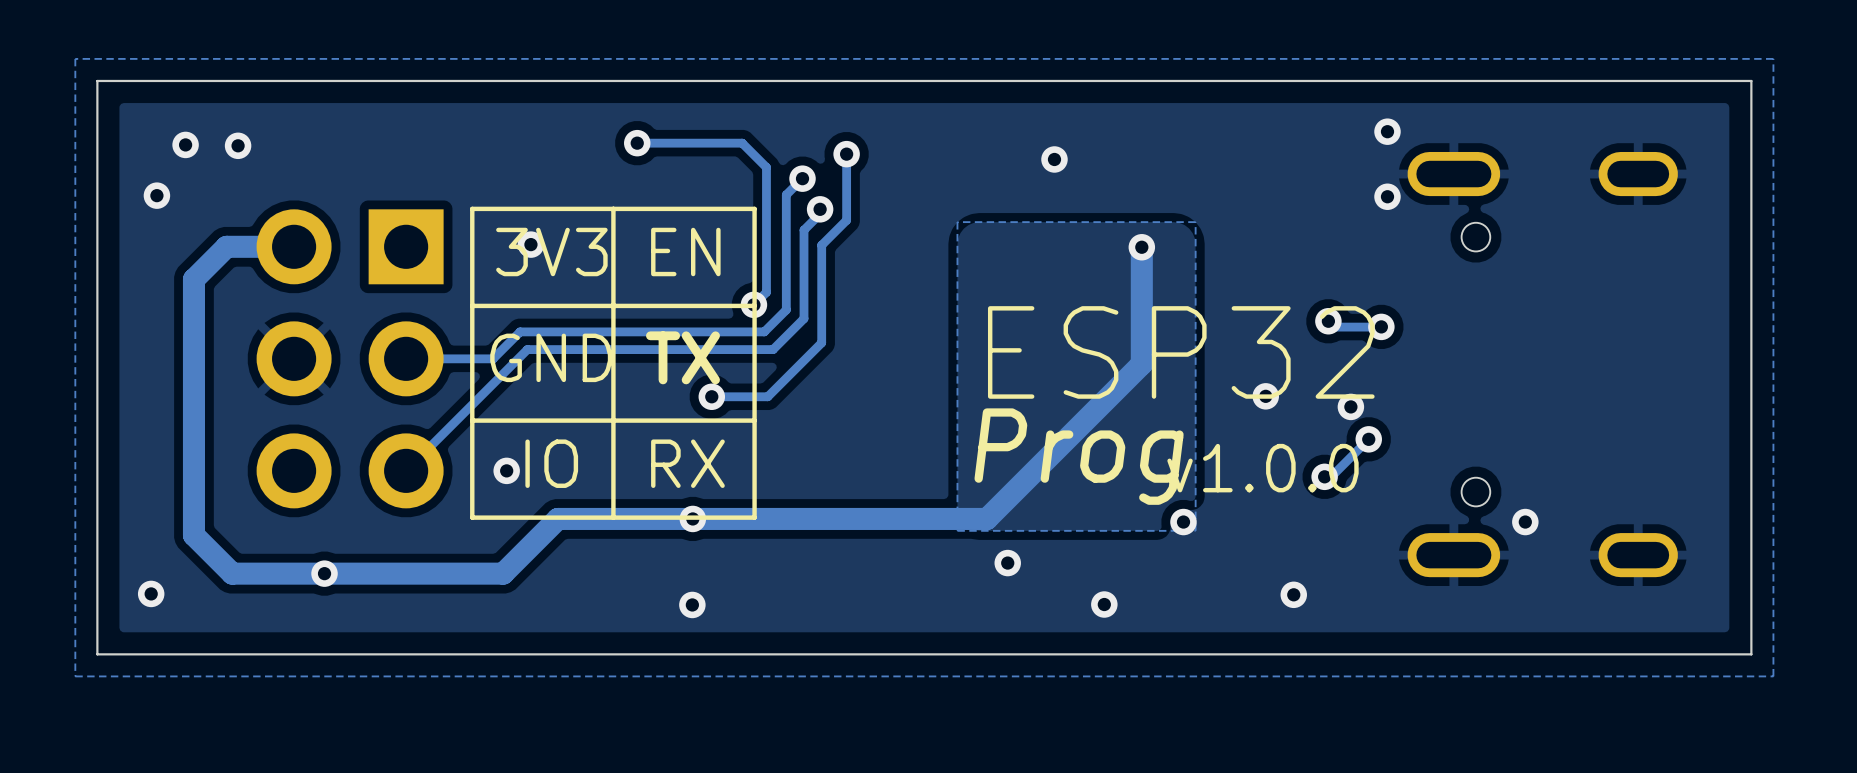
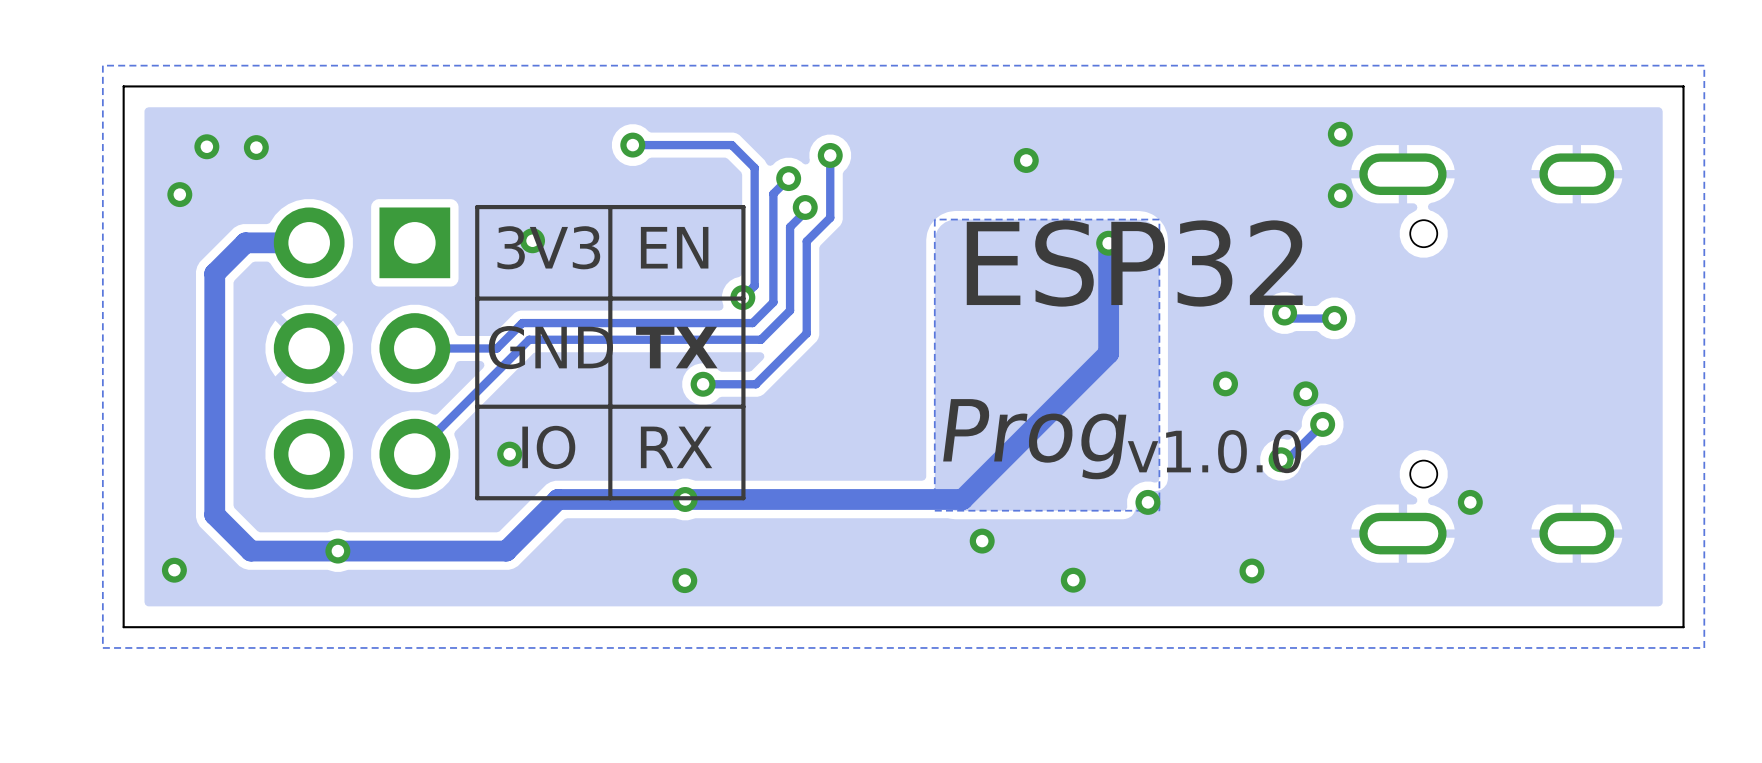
text position: ESP32 (1181, 352) -> ESP32 (1134, 263)

